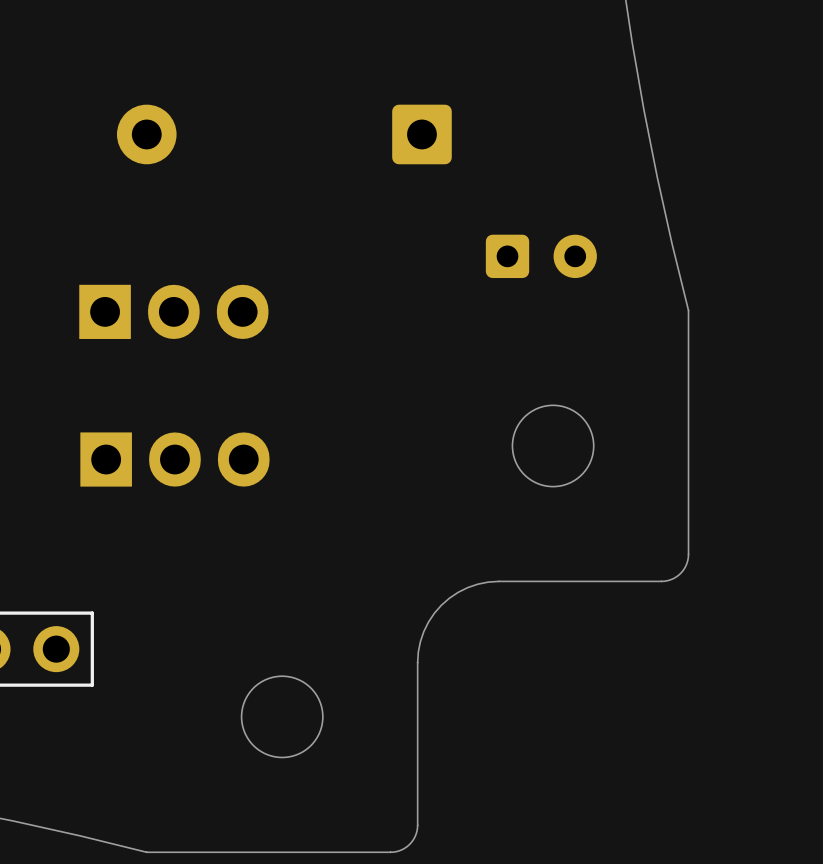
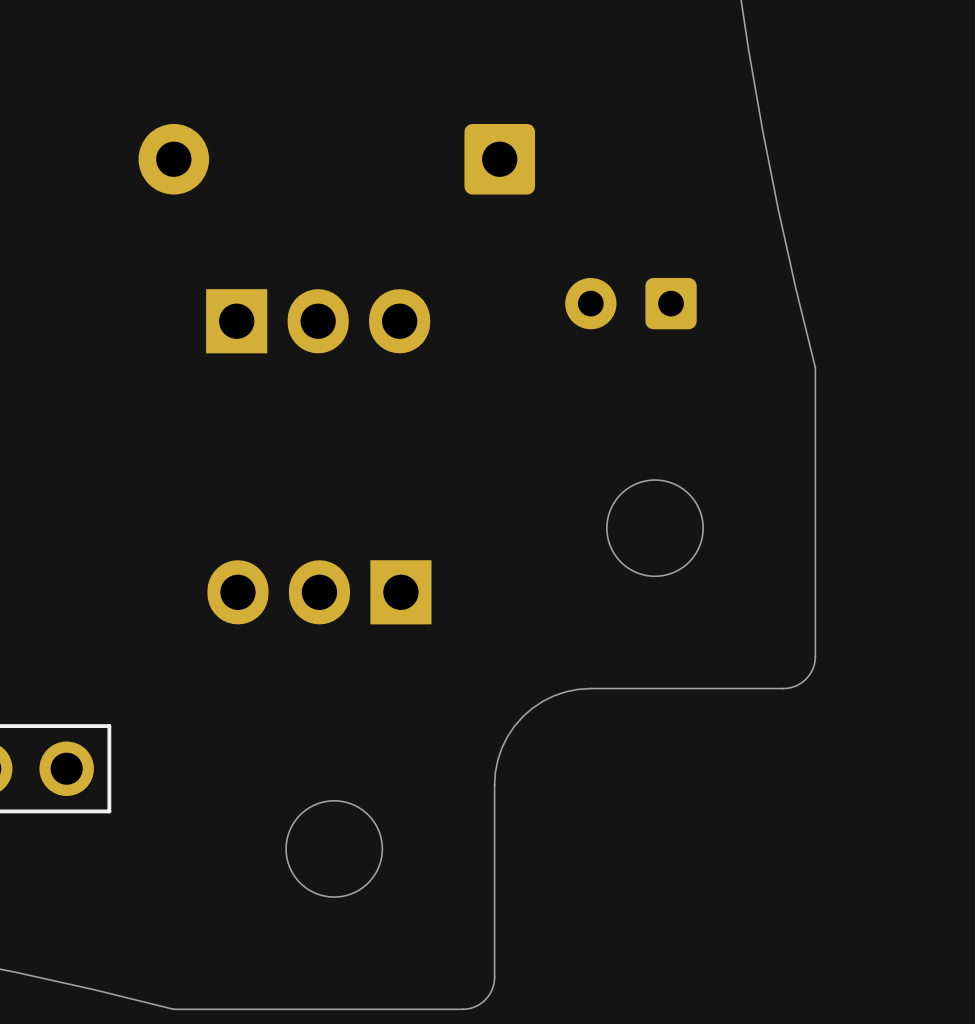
part rotation: 0° (541, 256) -> 180° (630, 303)
part position: (173, 311) -> (318, 321)
part rotation: 0° (174, 459) -> 180° (319, 592)

